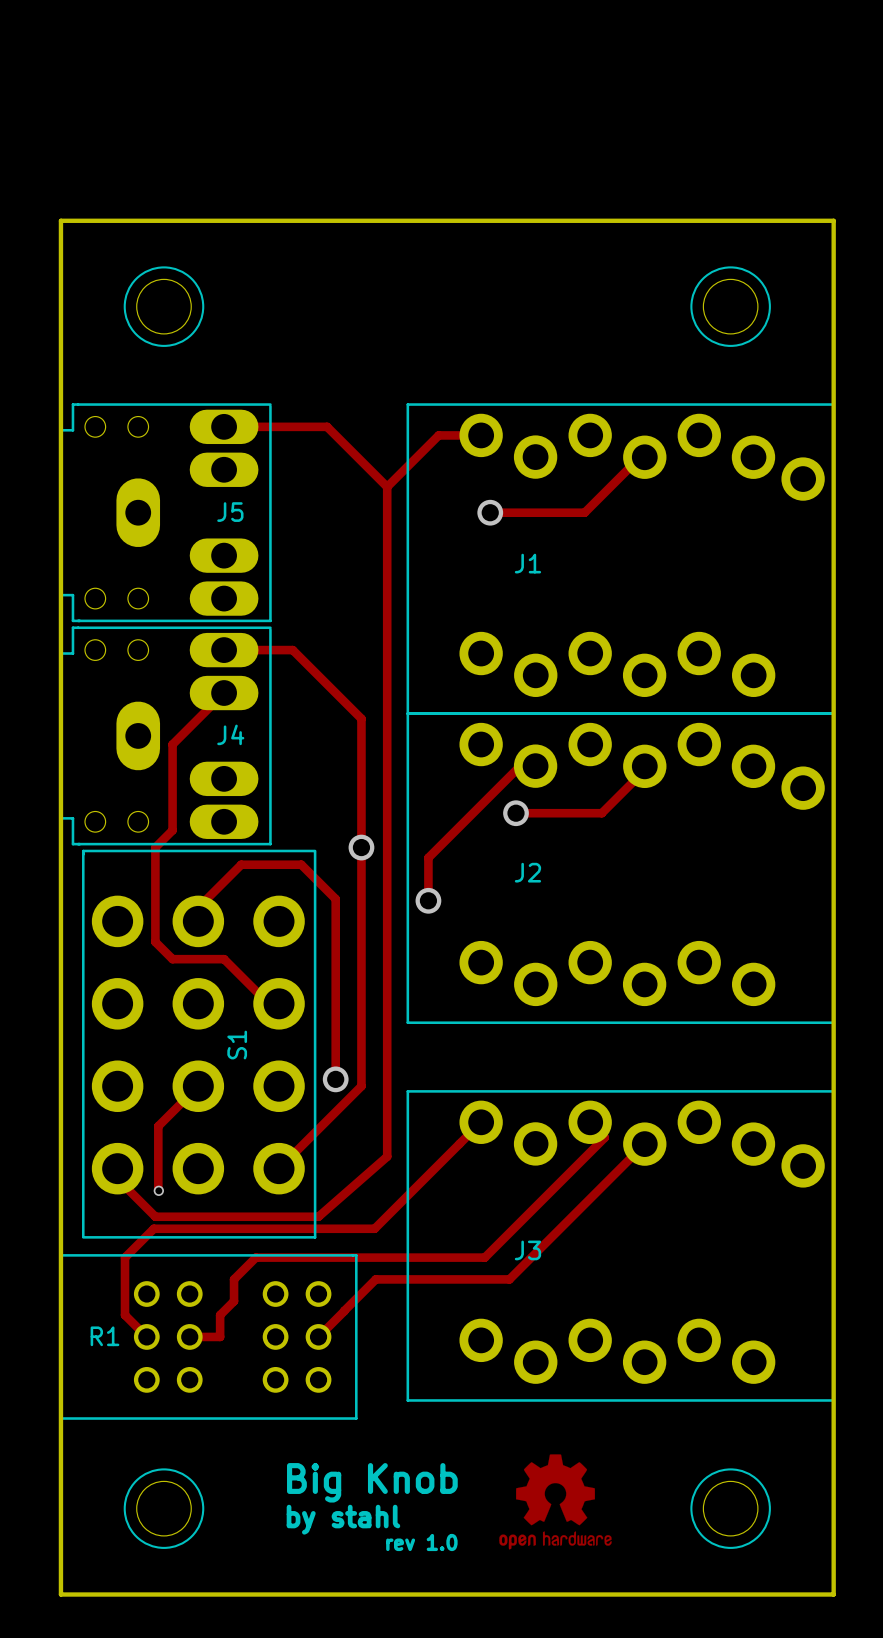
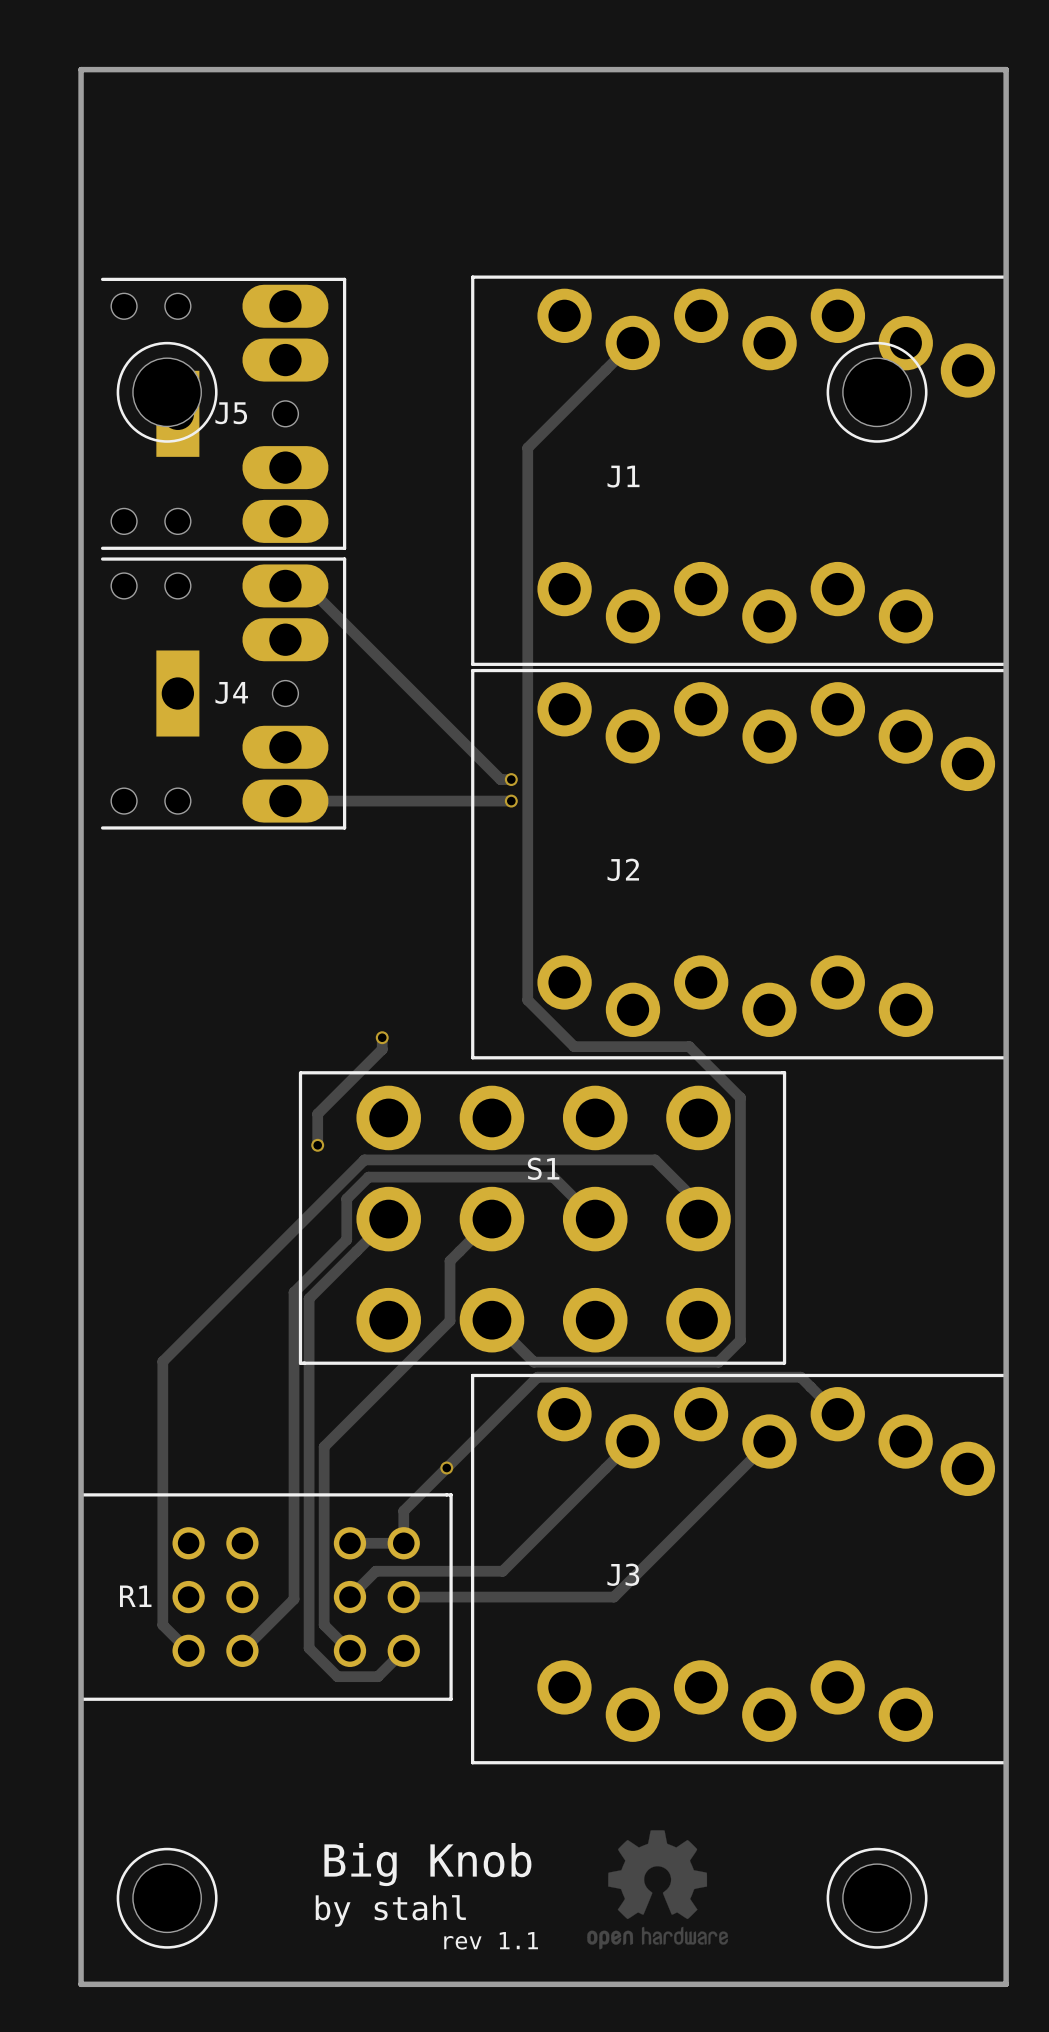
board edge: (833, 220) (60, 220) (60, 1594) (833, 1594) (833, 1577) -> (1006, 284) (1006, 69) (81, 69) (81, 1984) (1006, 1984)
track: none -> (632, 342) (527, 447) (527, 1000) (574, 1046) (689, 1046) (740, 1097) (740, 1340) (718, 1362) (533, 1362) (491, 1320)
J5 footprint: [59, 403, 272, 623] -> [100, 277, 347, 550]
track: (224, 426) (327, 426) (387, 486) -> none
track: (484, 433) (481, 435) (438, 435) (387, 486) -> none
track: (644, 457) (640, 457) (584, 512) (490, 512) -> none
track: none -> (285, 585) (306, 585) (500, 779) (511, 779)
track: (387, 486) (387, 1156) (318, 1216) (155, 1216) (117, 1178) (117, 1168) -> none
J5 name position: J5 (230, 512) -> J5 (231, 413)
via: (490, 512) -> none
J1 position: (620, 559) -> (739, 470)
via: none -> (511, 779)
J4 footprint: [59, 626, 272, 846] -> [100, 557, 347, 830]
track: none -> (285, 801) (511, 801)
via: none -> (511, 801)
track: (224, 650) (292, 650) (361, 718) (361, 1086) (279, 1168) (289, 1168) -> none
track: (224, 693) (172, 744) (172, 830) (155, 847) (155, 942) (172, 959) (224, 959) (268, 1003) (279, 1003) -> none
J4 name position: J4 (230, 734) -> J4 (231, 692)
track: (535, 766) (535, 750) (428, 857) (428, 900) -> none
track: (644, 766) (644, 770) (601, 813) (516, 813) -> none
via: (516, 813) -> none
track: none -> (382, 1037) (382, 1049) (317, 1113) (317, 1145)
via: none -> (382, 1037)
via: (361, 847) -> none
J2 position: (620, 868) -> (739, 864)
via: (428, 900) -> none
via: none -> (317, 1145)
track: (198, 921) (198, 907) (241, 864) (301, 864) (335, 899) (335, 1079) -> none
track: none -> (388, 1219) (309, 1298) (309, 1648) (337, 1676) (377, 1676) (403, 1650)
track: none -> (491, 1219) (450, 1261) (450, 1320) (324, 1446) (324, 1625) (349, 1650)
track: none -> (698, 1219) (698, 1203) (655, 1159) (364, 1159) (162, 1361) (162, 1625) (188, 1650)
S1 rotation: 0° (199, 1044) -> 90° counterclockwise (542, 1218)
S1 position: (199, 1044) -> (542, 1218)
via: (335, 1079) -> none
track: (198, 1086) (158, 1126) (158, 1190) -> none
track: (481, 1122) (374, 1228) (153, 1228) (125, 1257) (125, 1315) (146, 1336) -> none
track: none -> (837, 1414) (800, 1377) (537, 1377) (403, 1511) (403, 1543) (349, 1543)
track: (590, 1123) (604, 1137) (484, 1257) (255, 1257) (234, 1279) (234, 1301) -> (595, 1219) (553, 1177) (368, 1177) (346, 1198) (346, 1239) (294, 1292) (294, 1599) (254, 1638)
track: none -> (632, 1441) (502, 1571) (375, 1571) (349, 1597)
via: none -> (446, 1467)
via: (158, 1190) -> none
track: (520, 1268) (509, 1279) (375, 1279) (344, 1310) -> (613, 1597) (403, 1597)
track: (344, 1310) (318, 1336) -> none
track: (224, 1311) (220, 1315) (220, 1336) (189, 1336) -> none
R1 position: (208, 1336) -> (266, 1597)
text: rev 1.0 (421, 1542) -> rev 1.1 (491, 1940)

